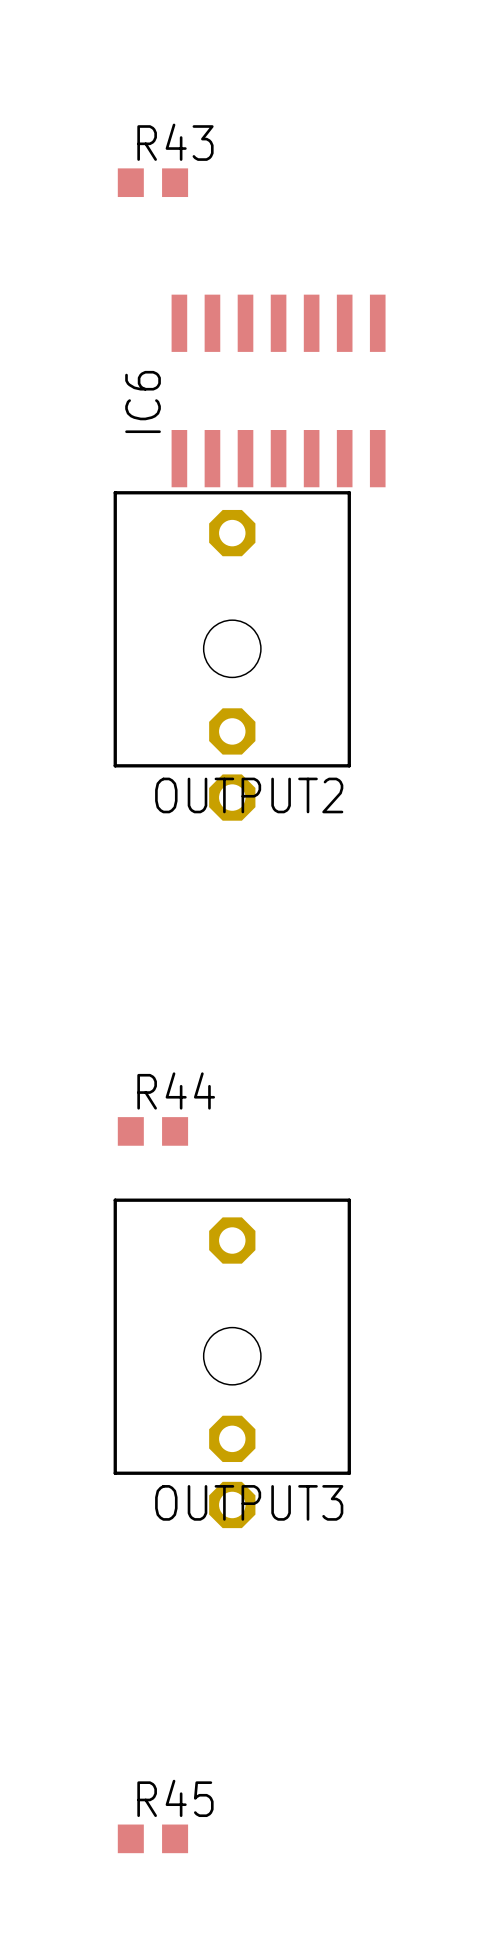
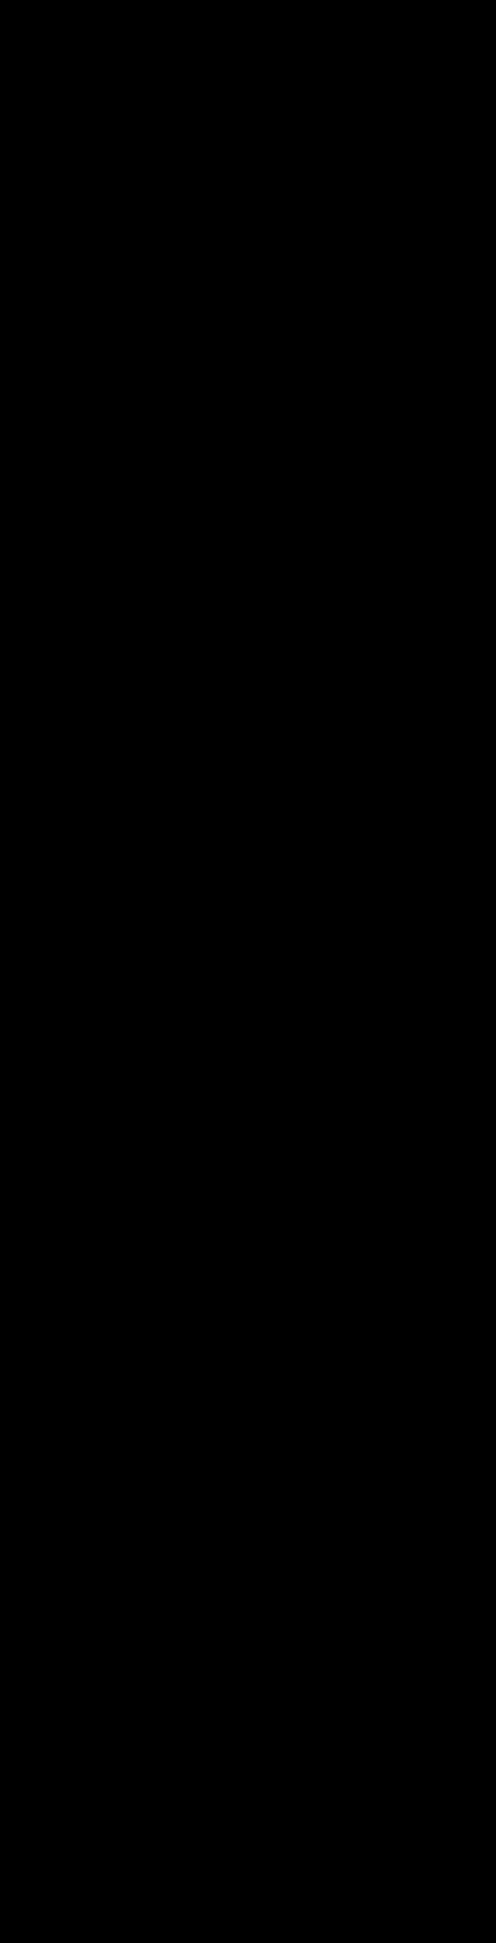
R43: (152, 182) -> none
IC6: (278, 390) -> none
OUTPUT2: (232, 655) -> none
R44: (152, 1131) -> none
OUTPUT3: (232, 1363) -> none
R45: (152, 1838) -> none

